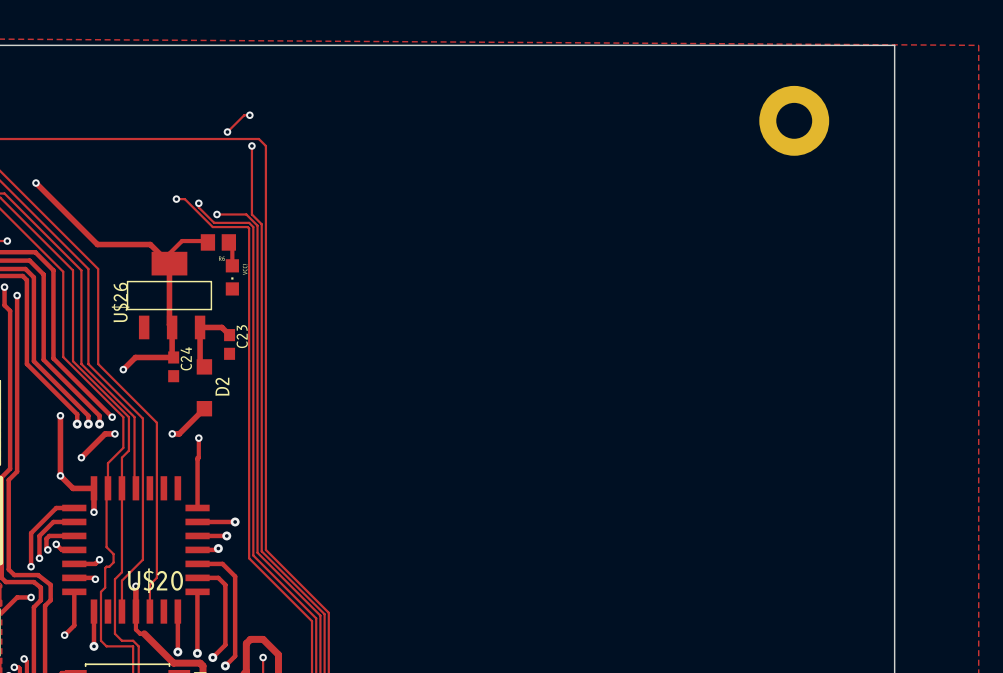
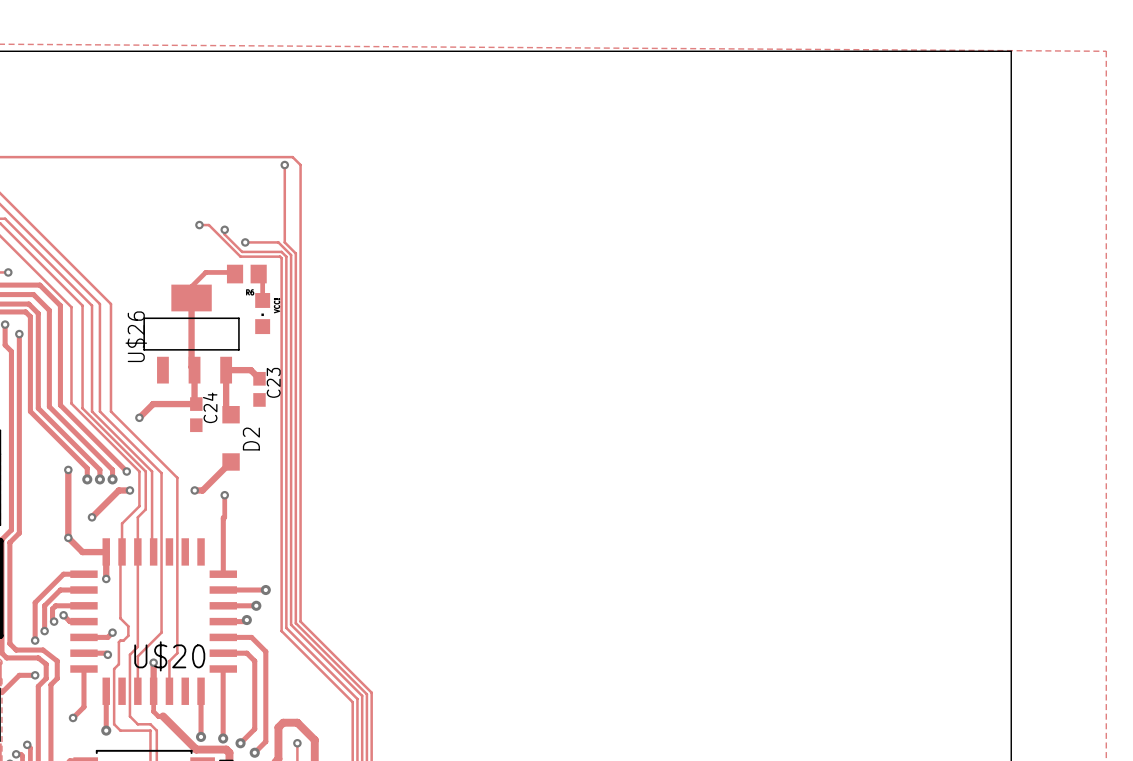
track: (249, 115) (244, 115) (227, 132) -> none
via: (249, 115) -> none
part: (794, 120) -> none
via: (227, 132) -> none
track: (35, 183) (97, 244) (150, 244) (169, 263) -> none
via: (35, 183) -> none

